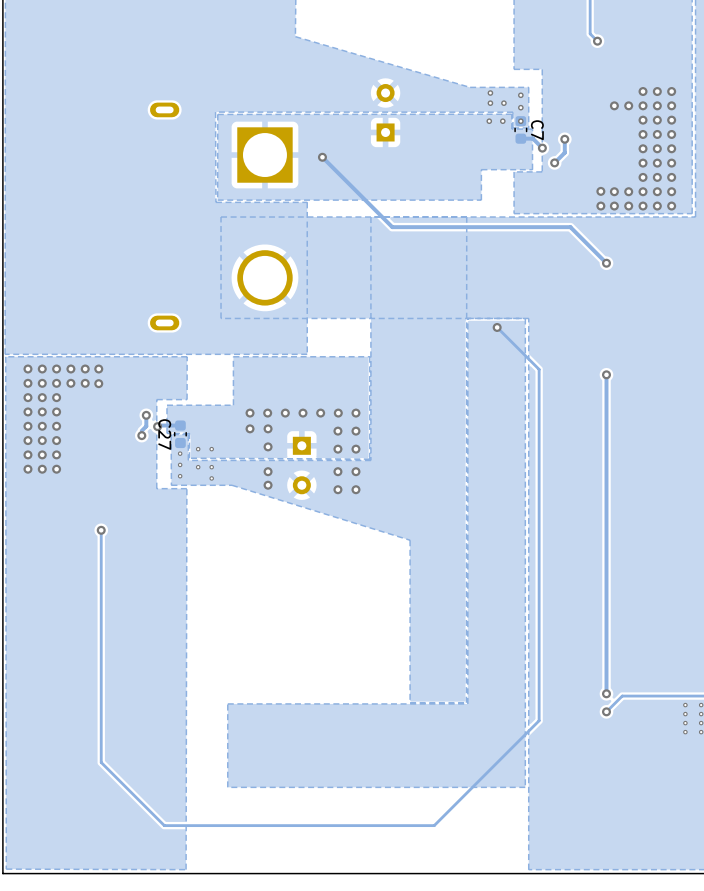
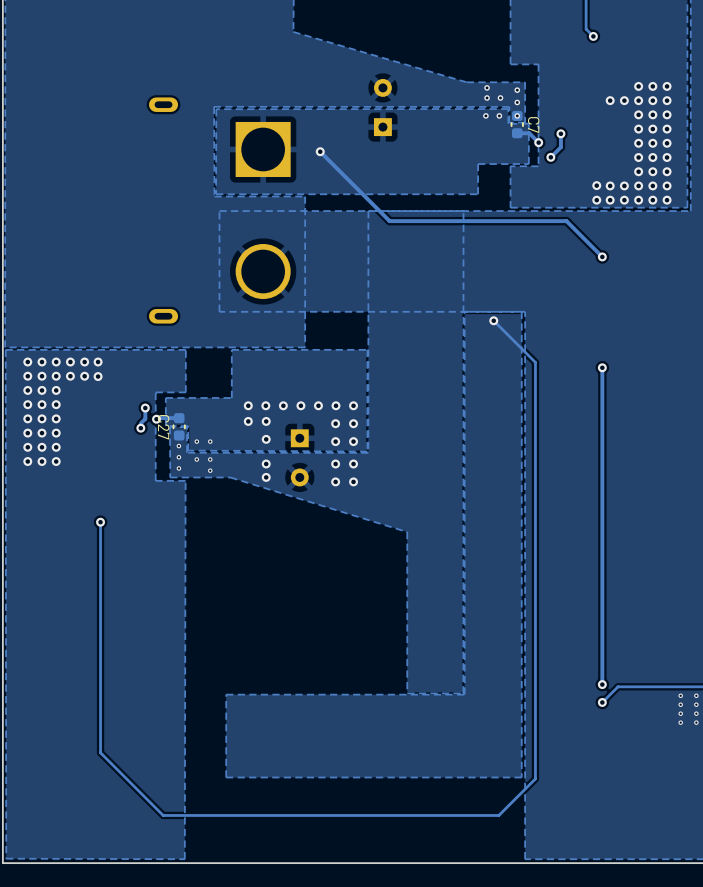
track: (539, 720) (434, 825) -> (535, 711) (535, 778) (498, 815) (431, 815)

